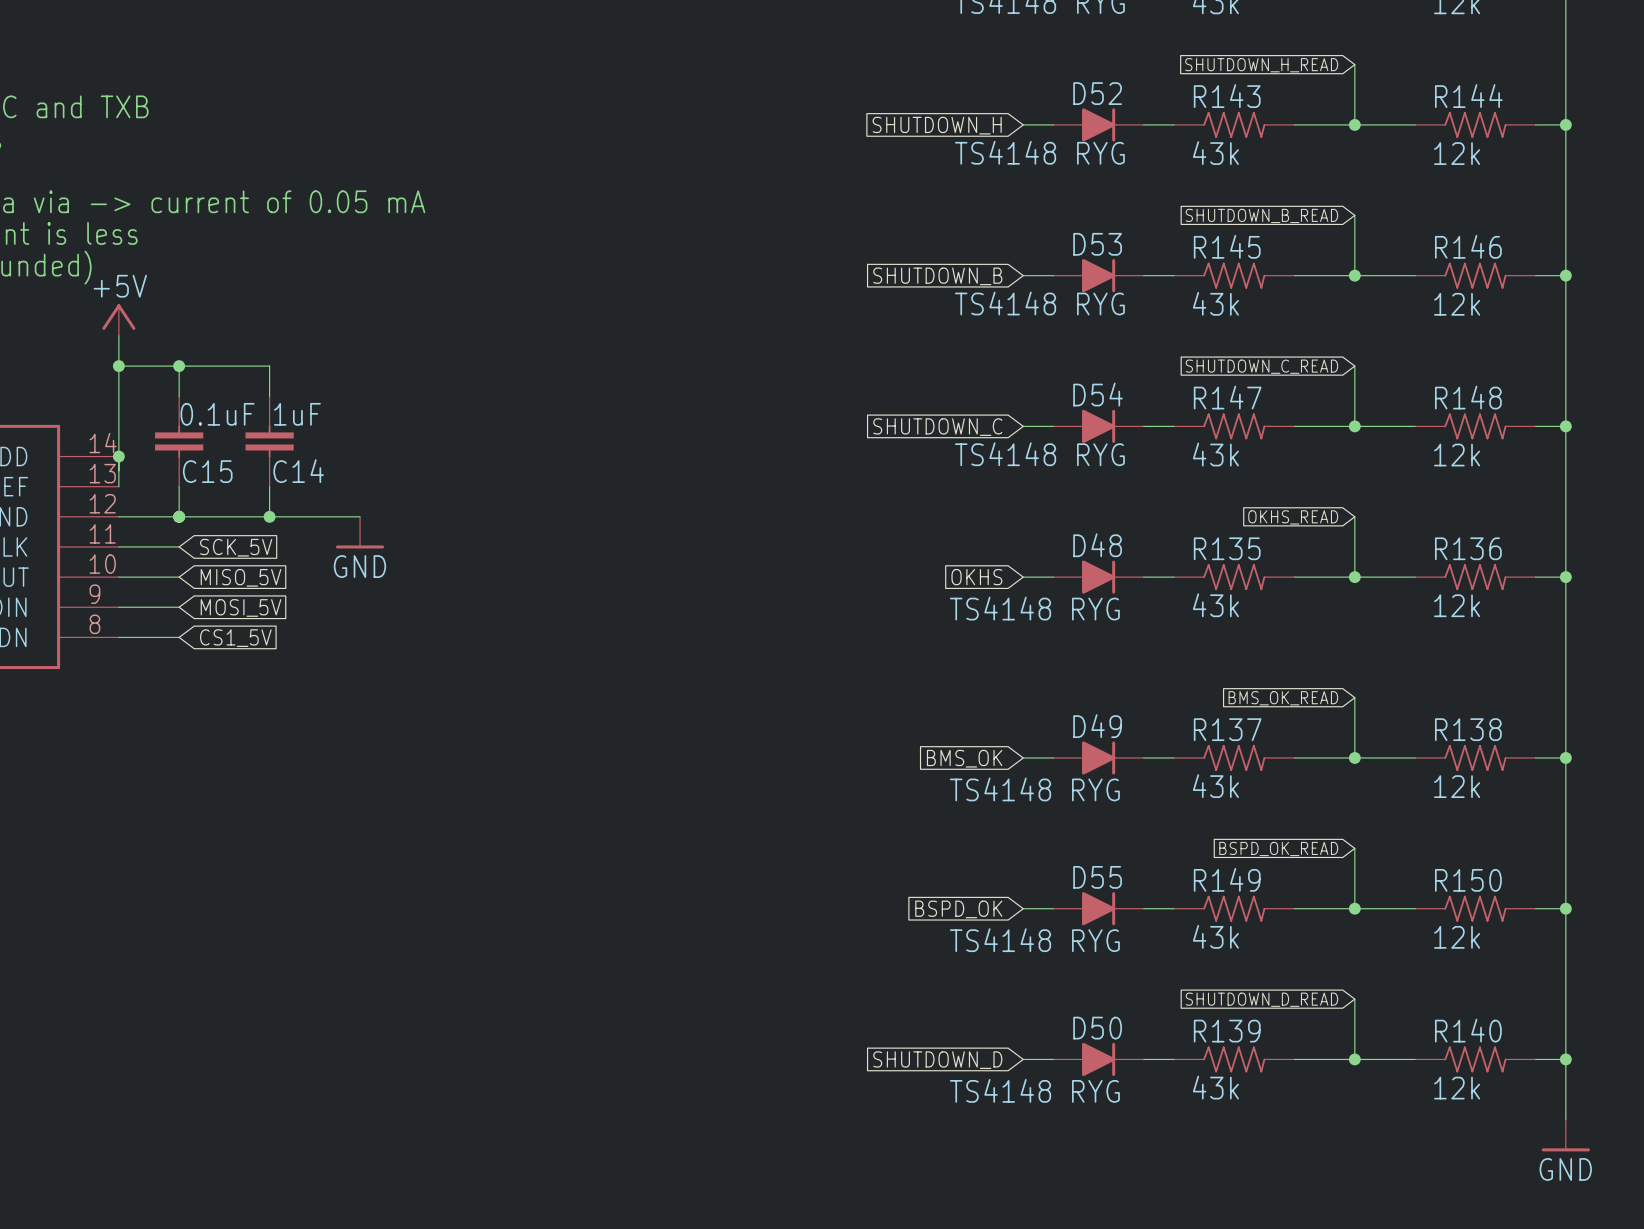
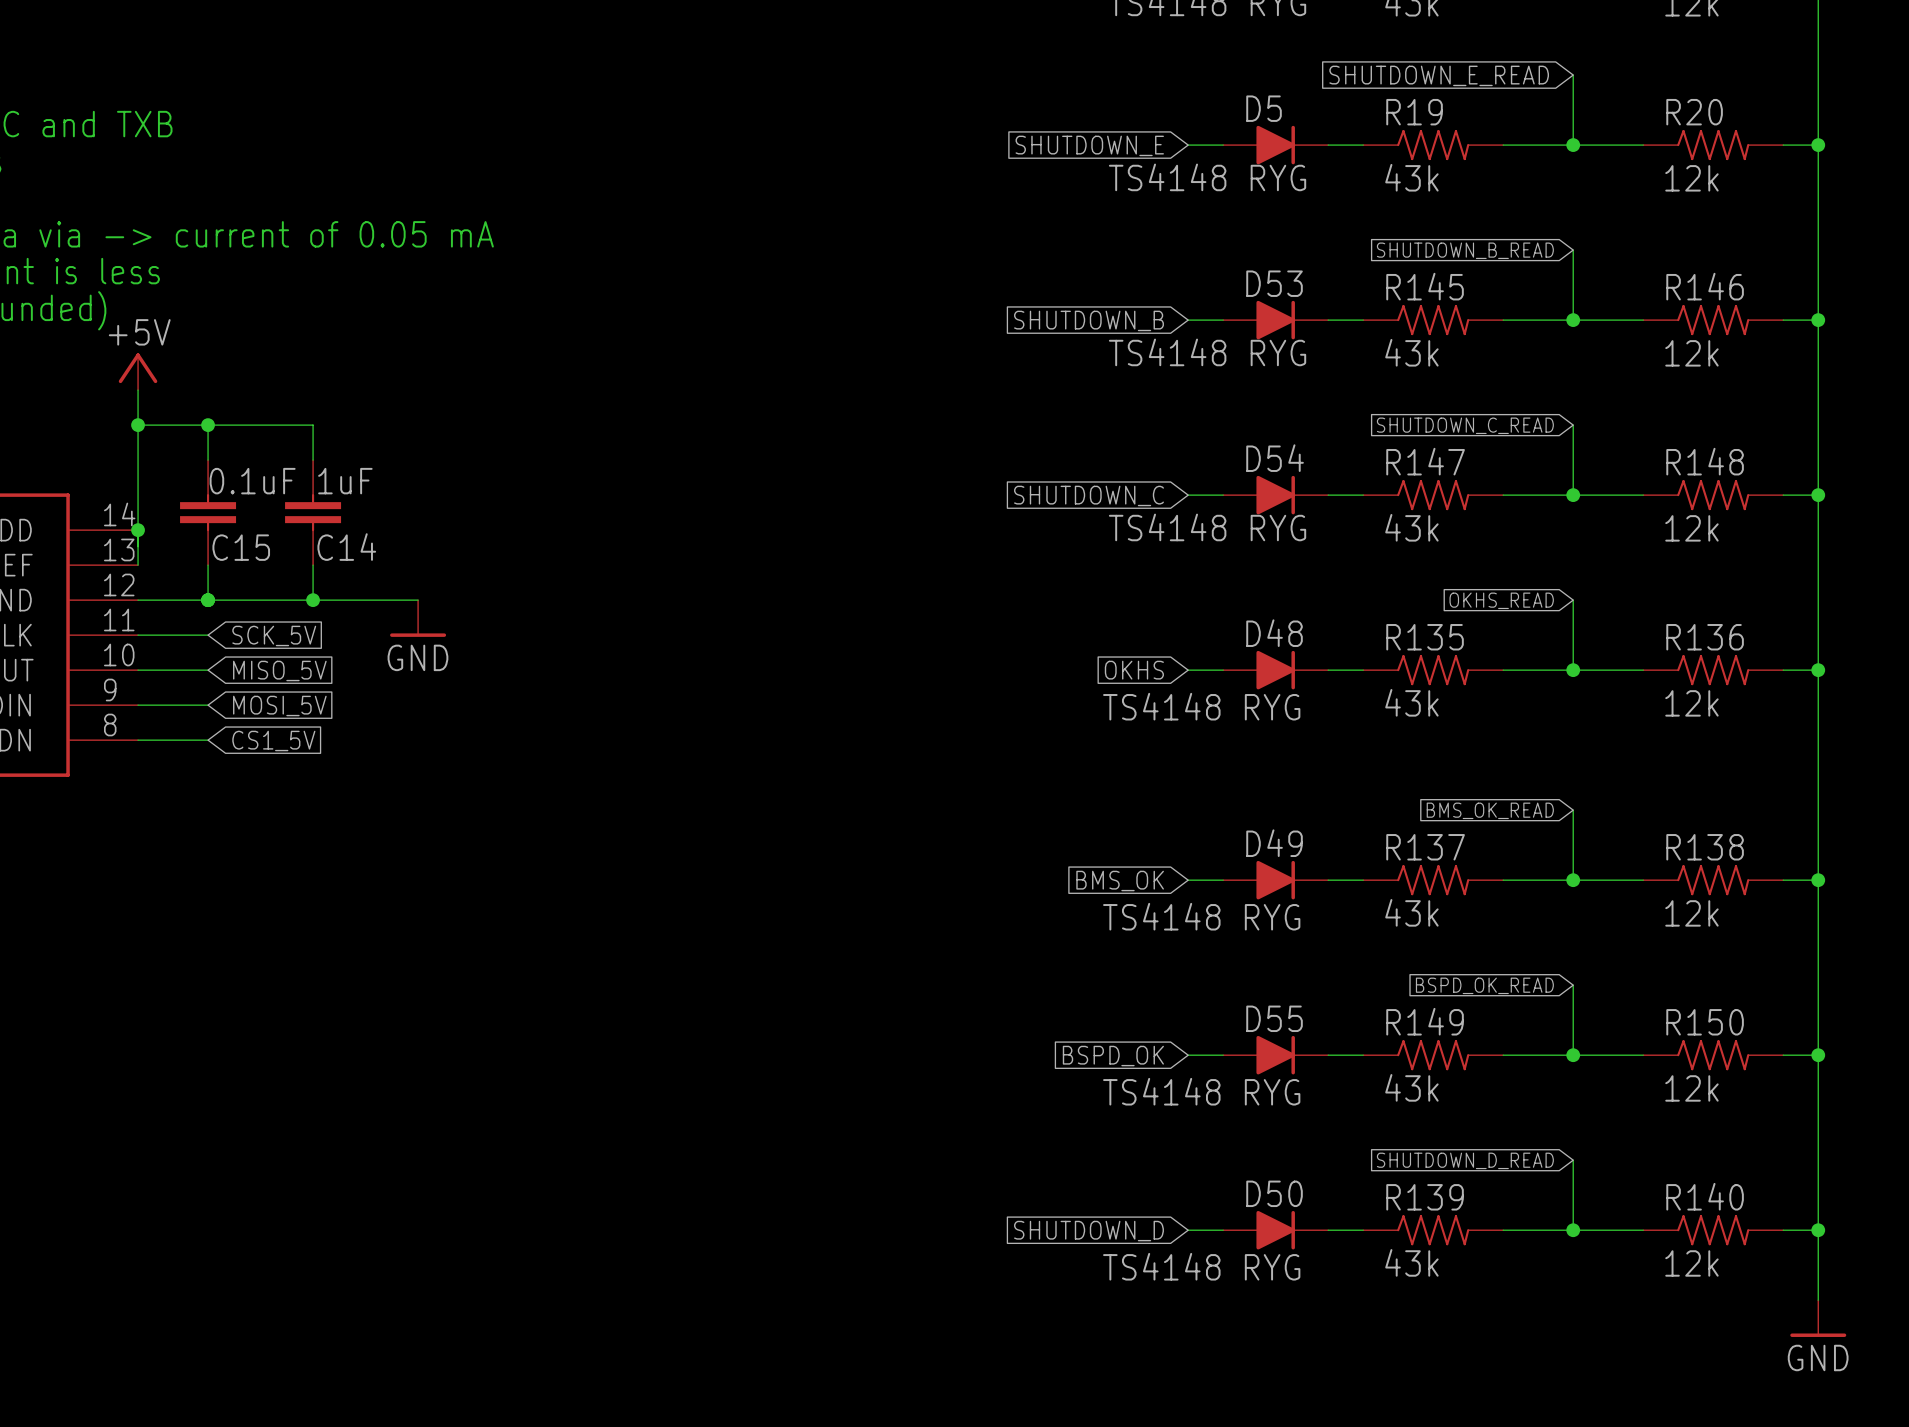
global label: SHUTDOWN_H_READ (1261, 65) -> SHUTDOWN_E_READ (1439, 75)
D52 name: D52 (1097, 93) -> D5 (1264, 108)
R143 name: R143 (1227, 96) -> R19 (1414, 112)
R144 name: R144 (1468, 96) -> R20 (1694, 112)
global label: SHUTDOWN_H (937, 125) -> SHUTDOWN_E (1089, 145)

